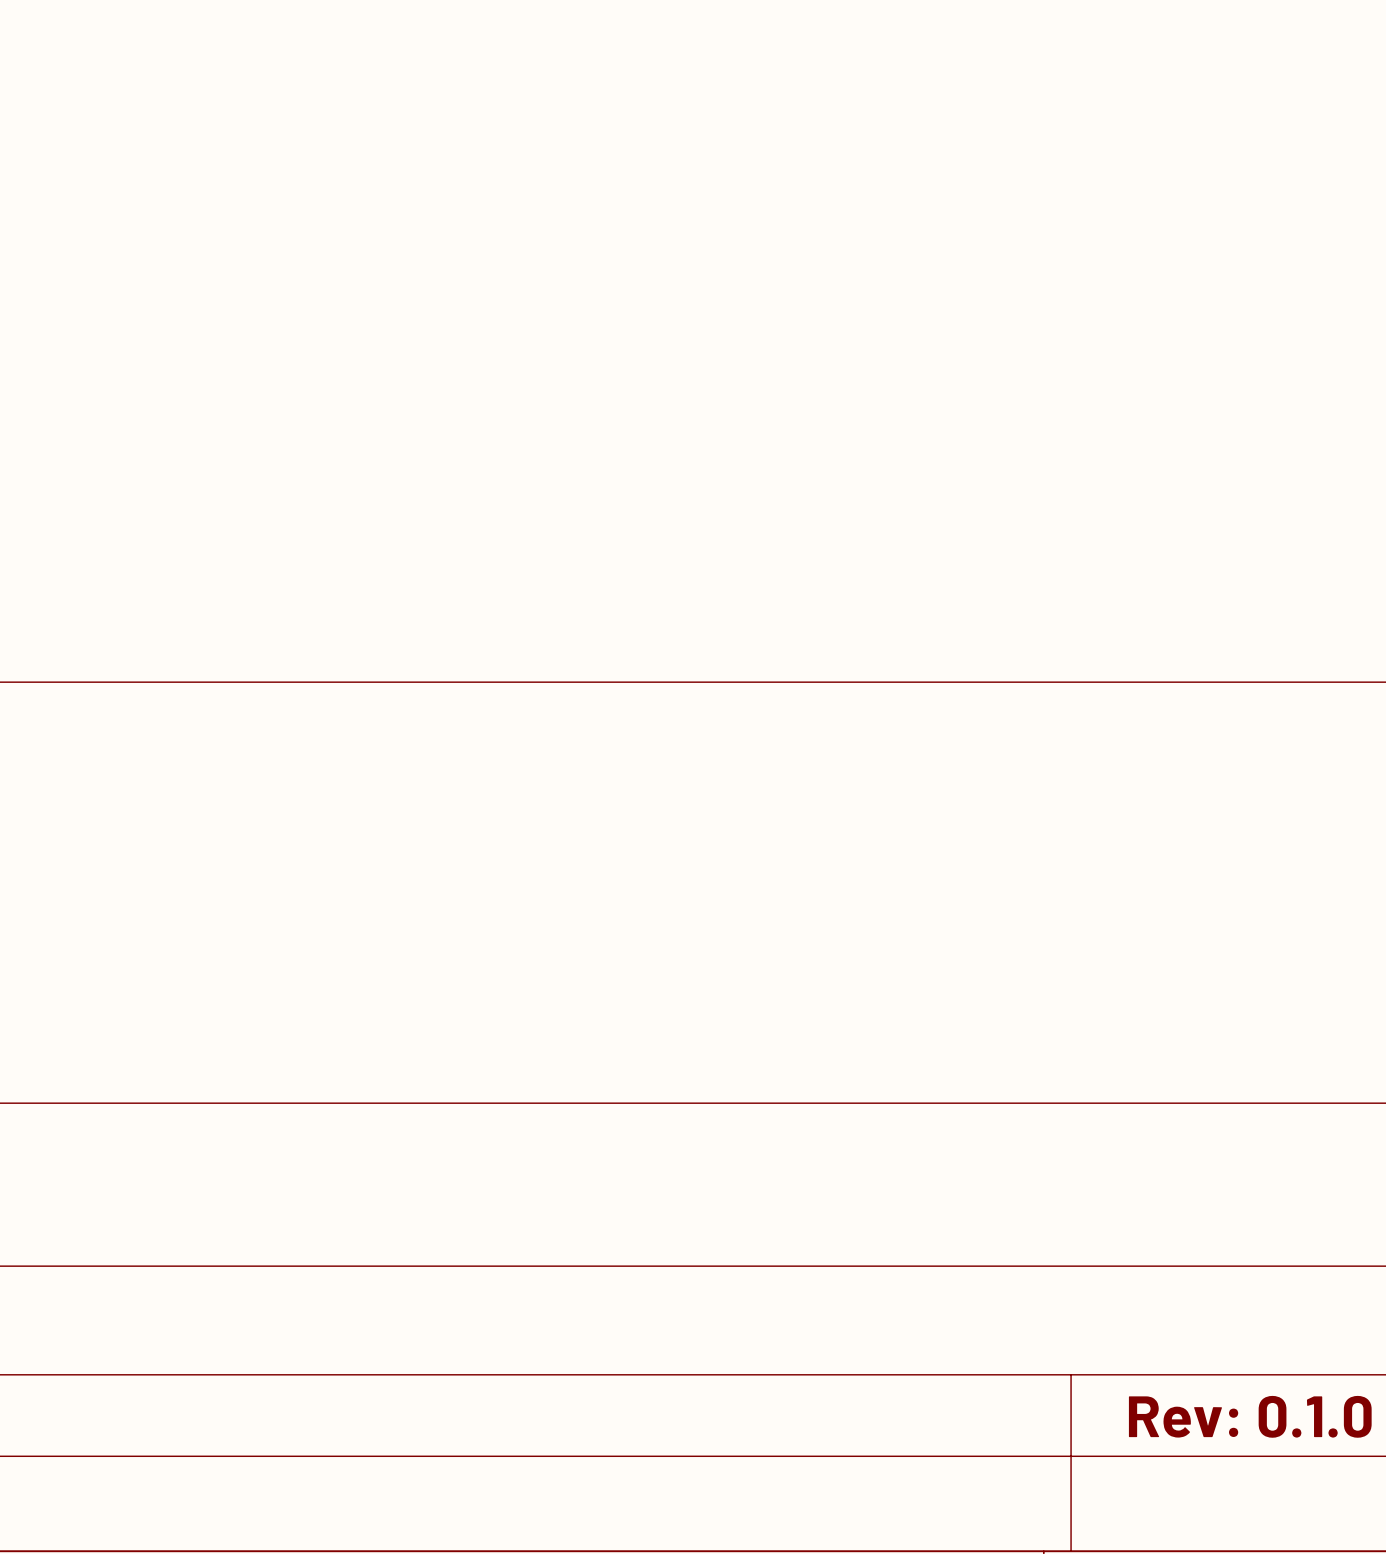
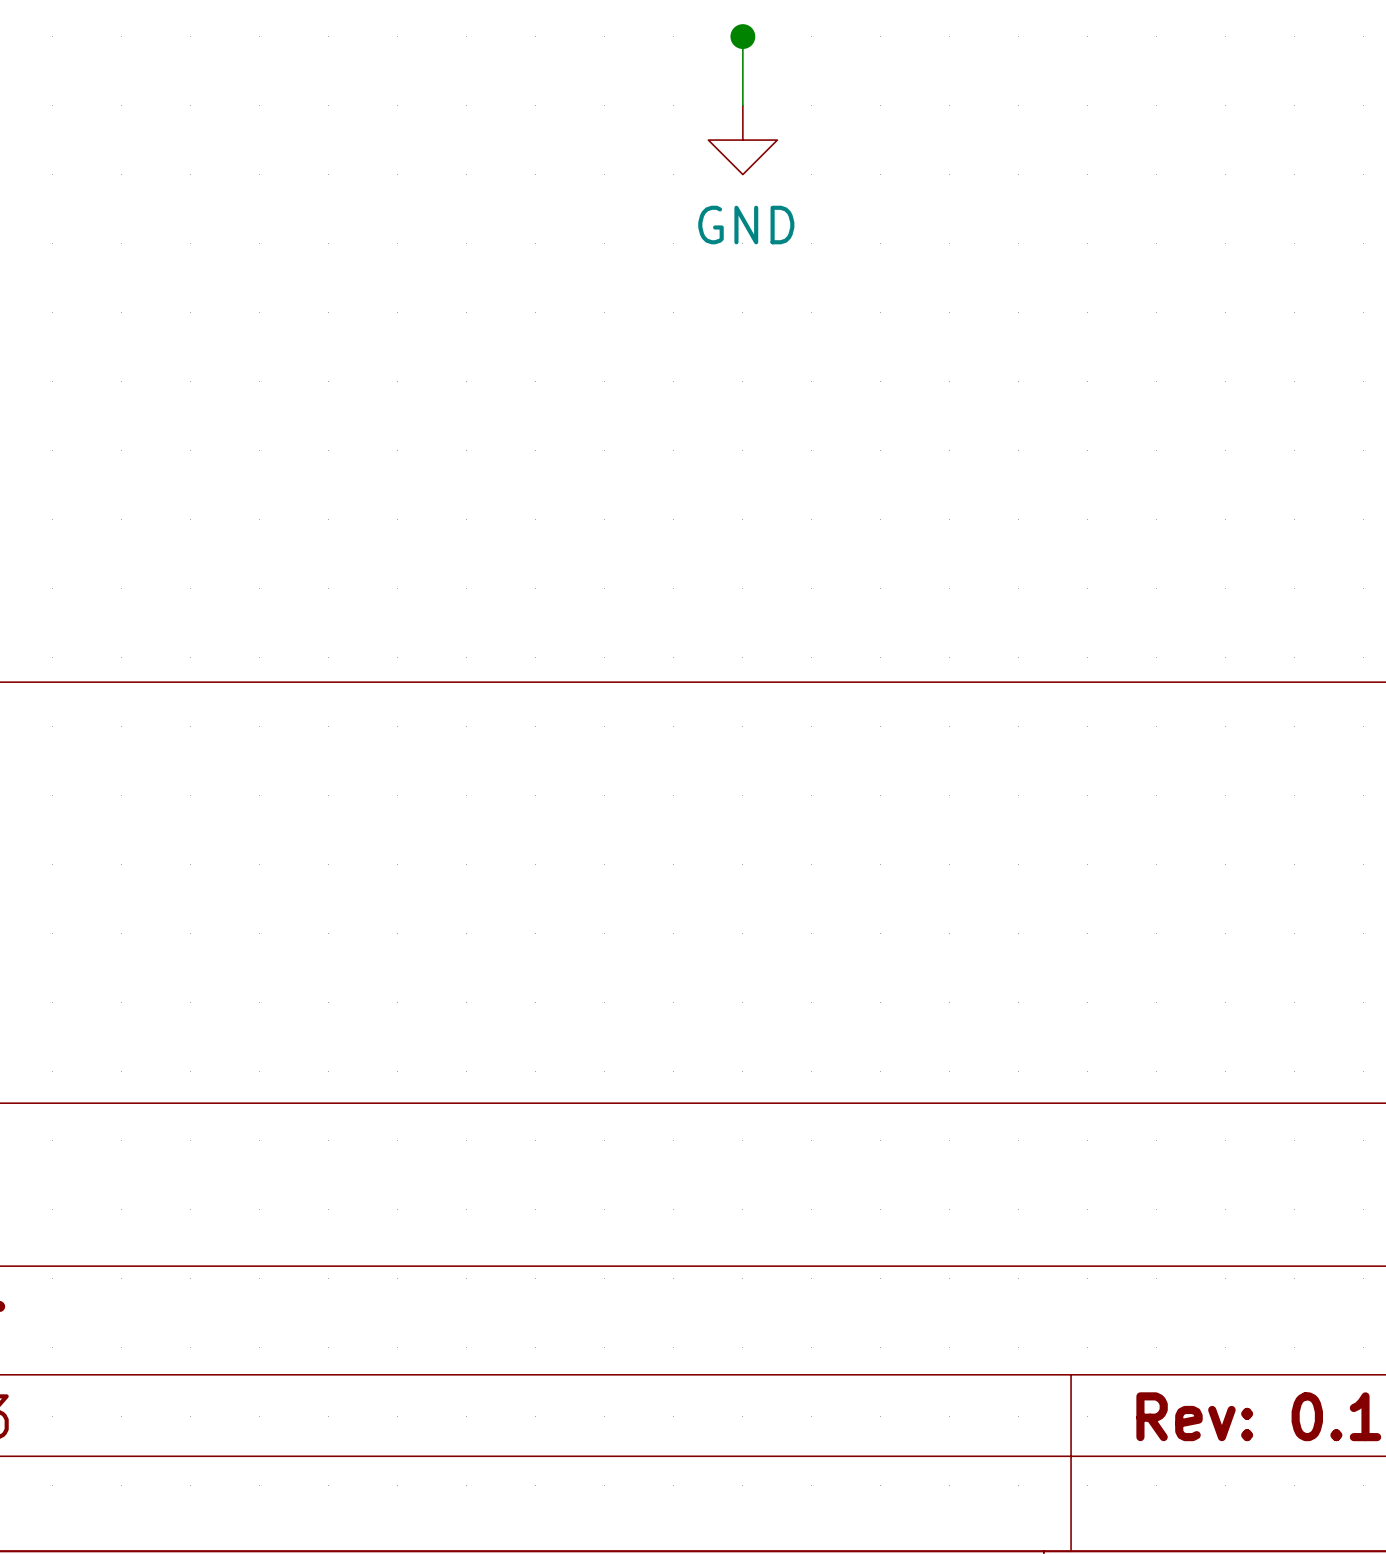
wire: none -> (742, 36) (742, 105)
junction: none -> (742, 36)
power symbol: none -> GND (742, 140)

